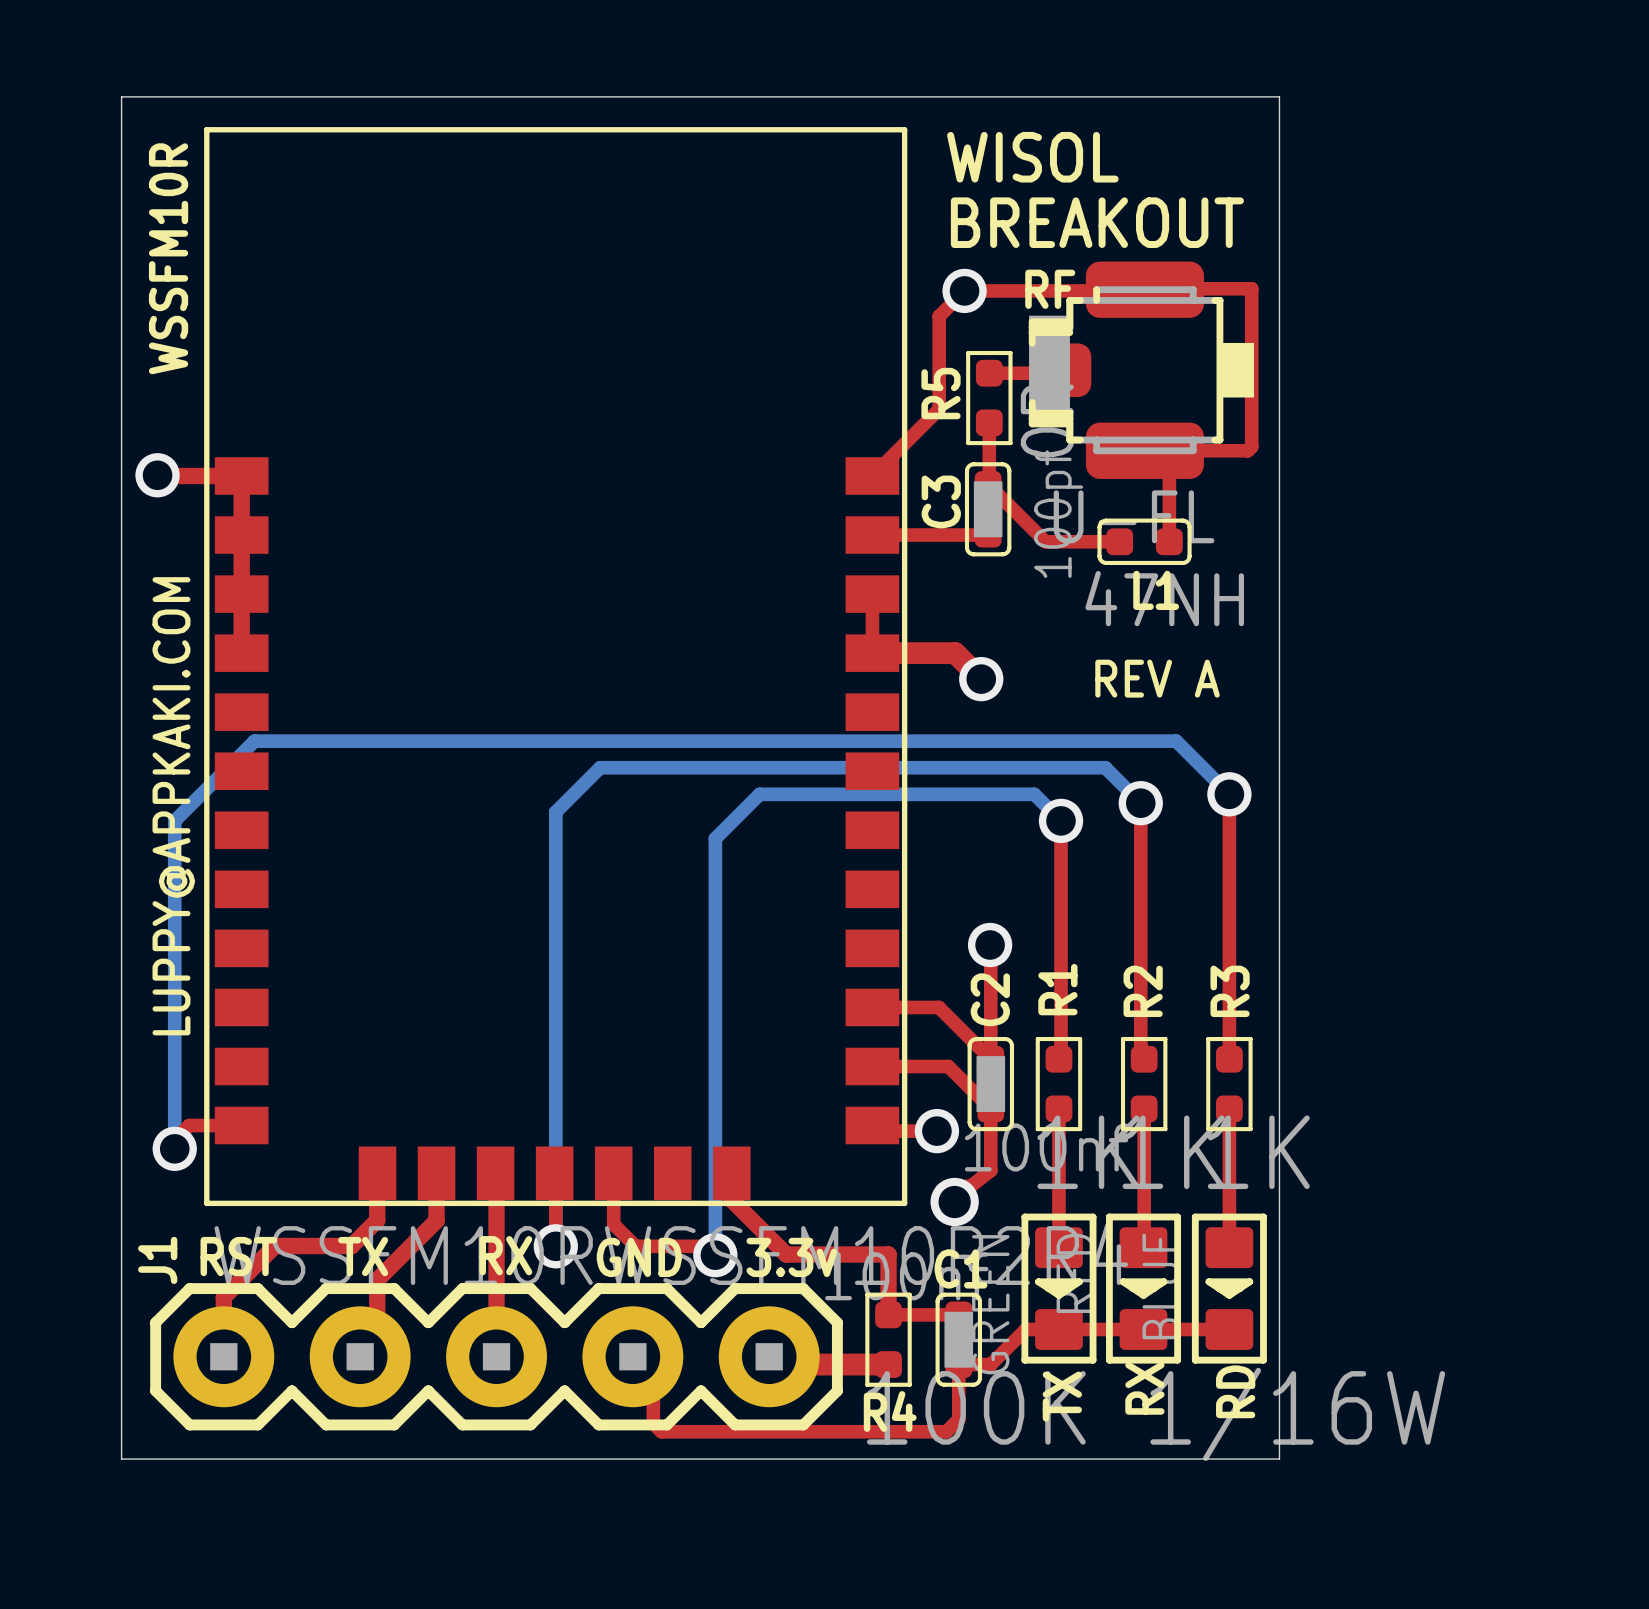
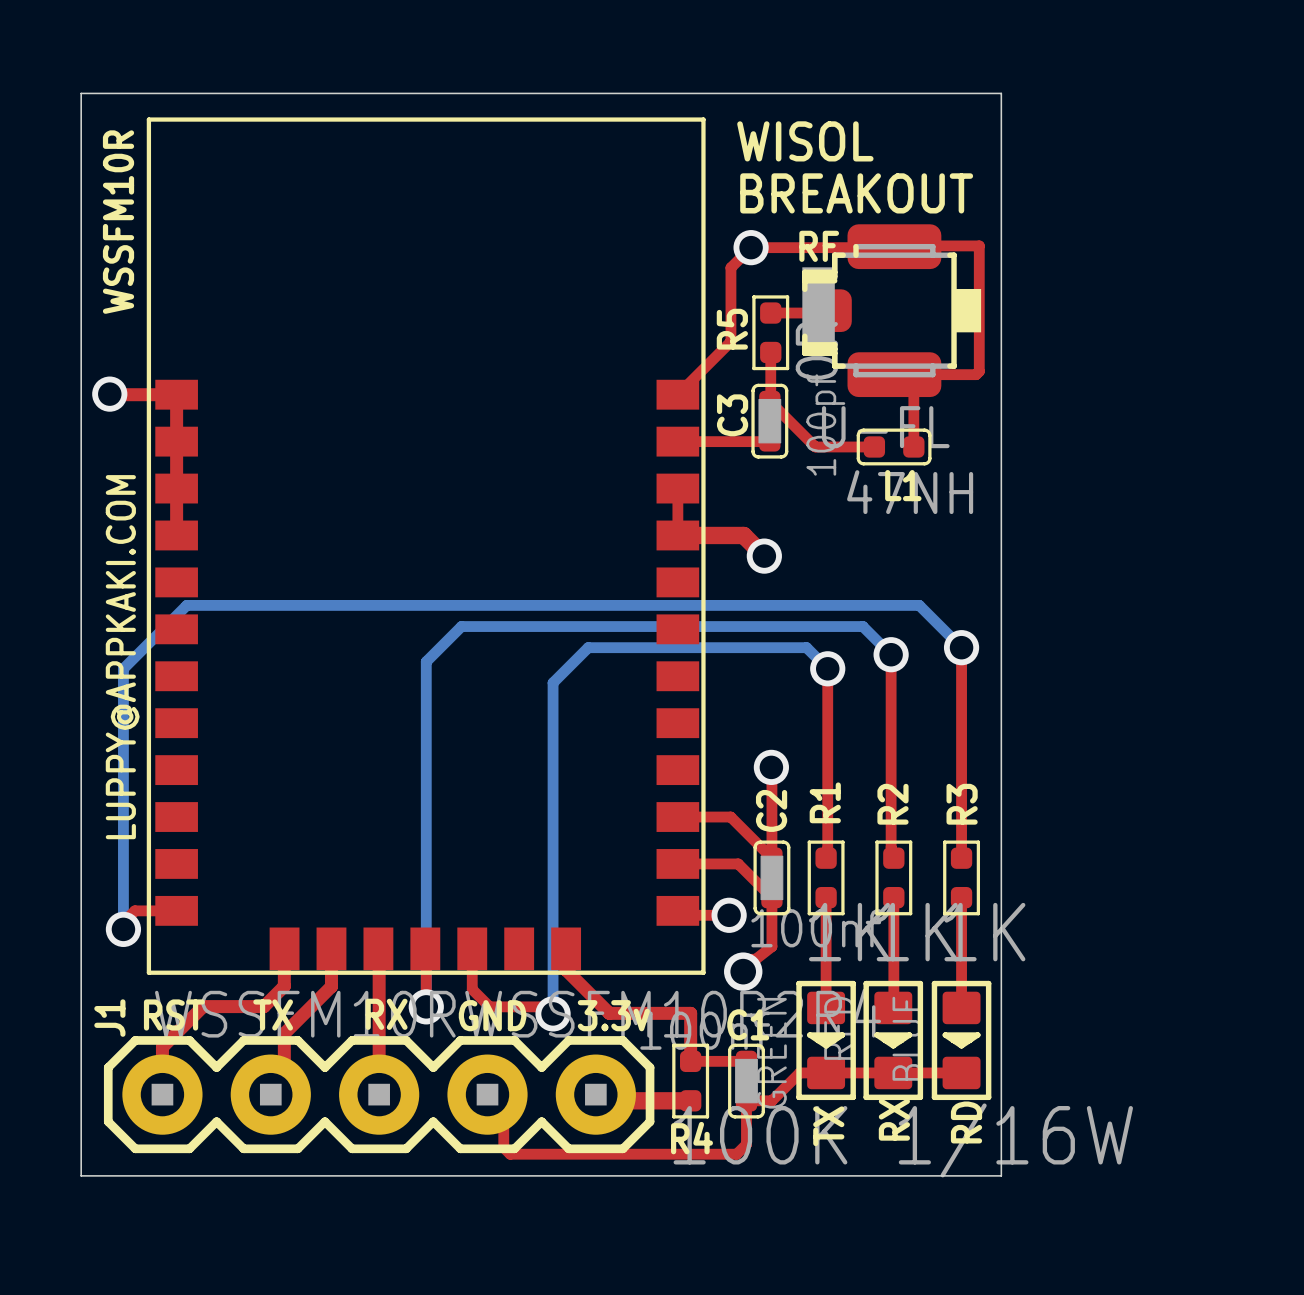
text: REV A (1157, 678) -> none

